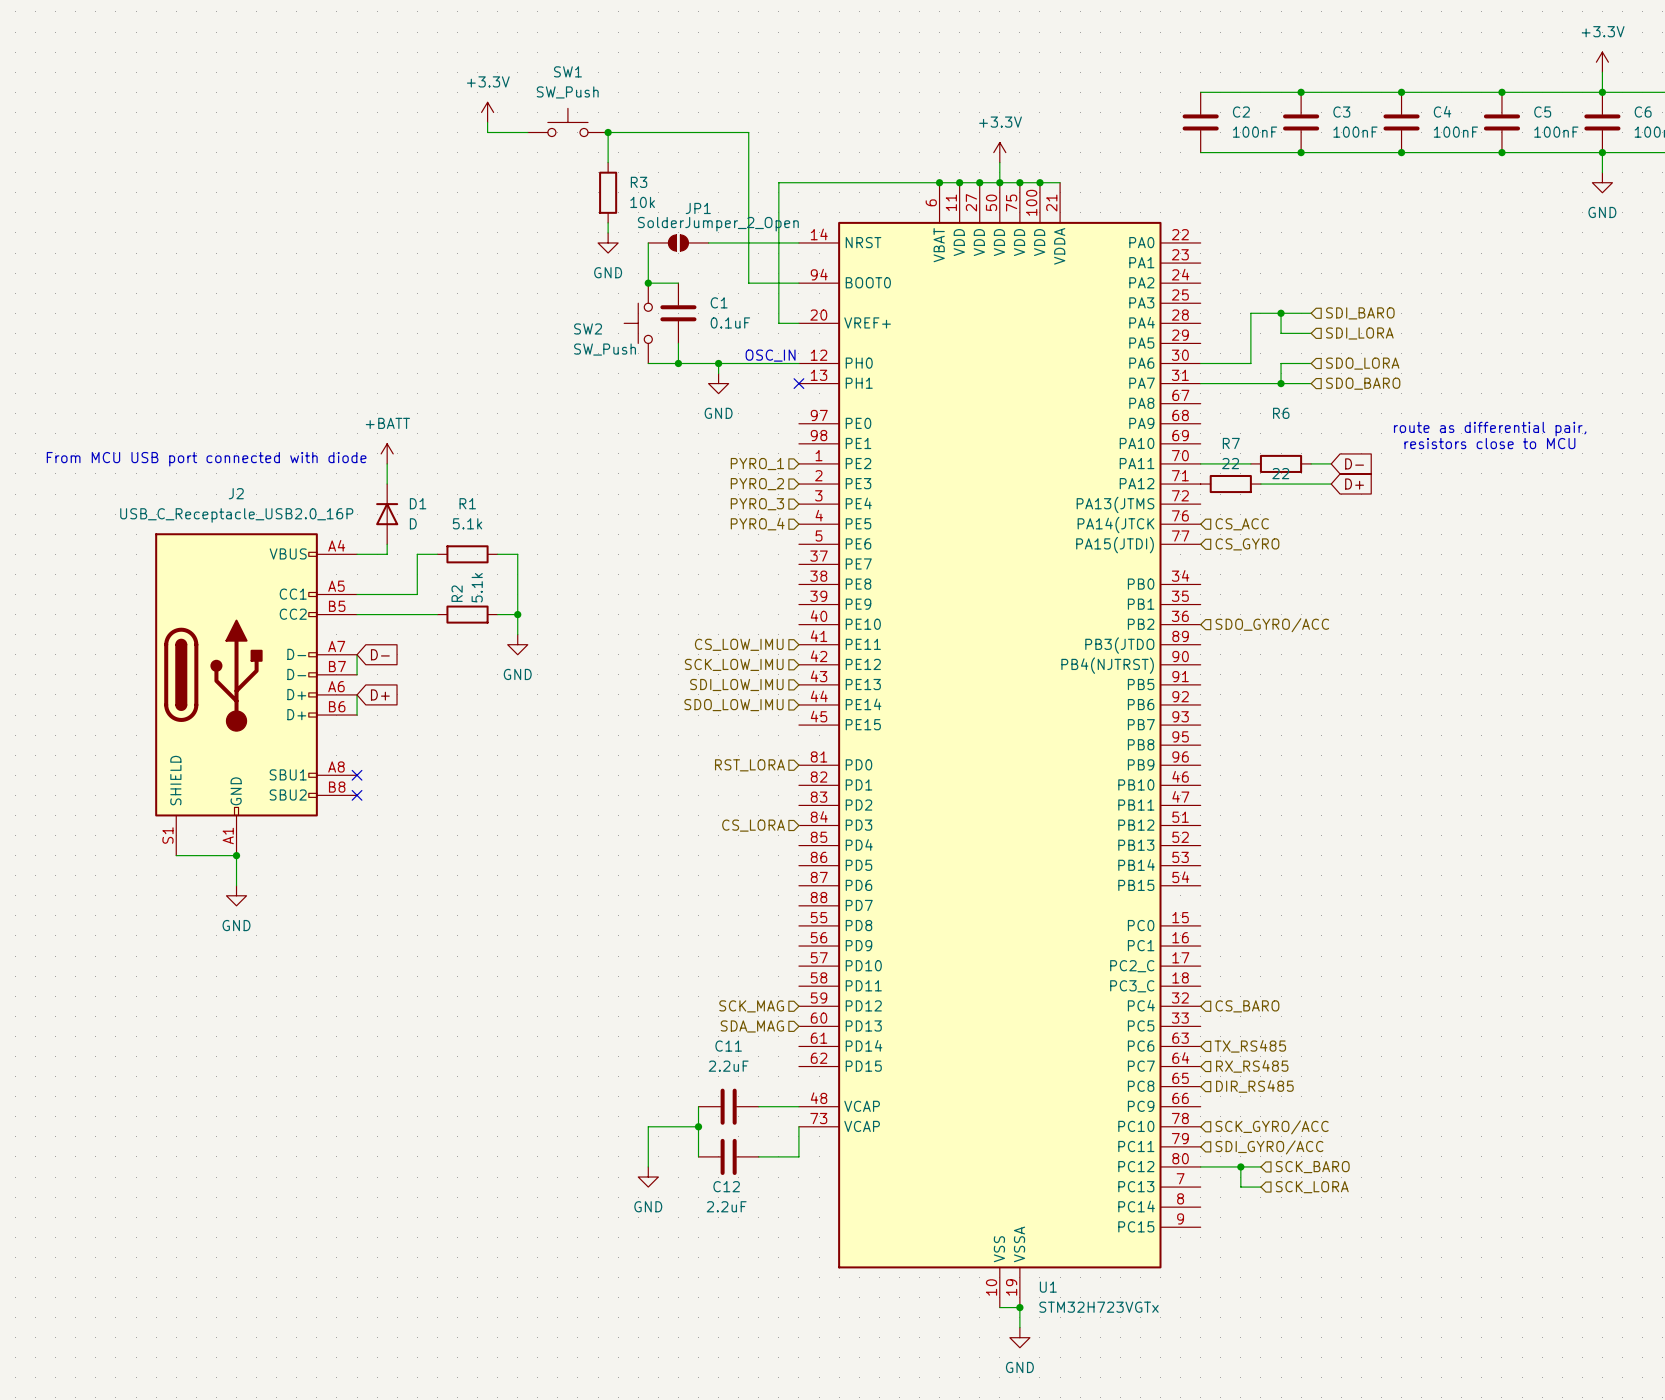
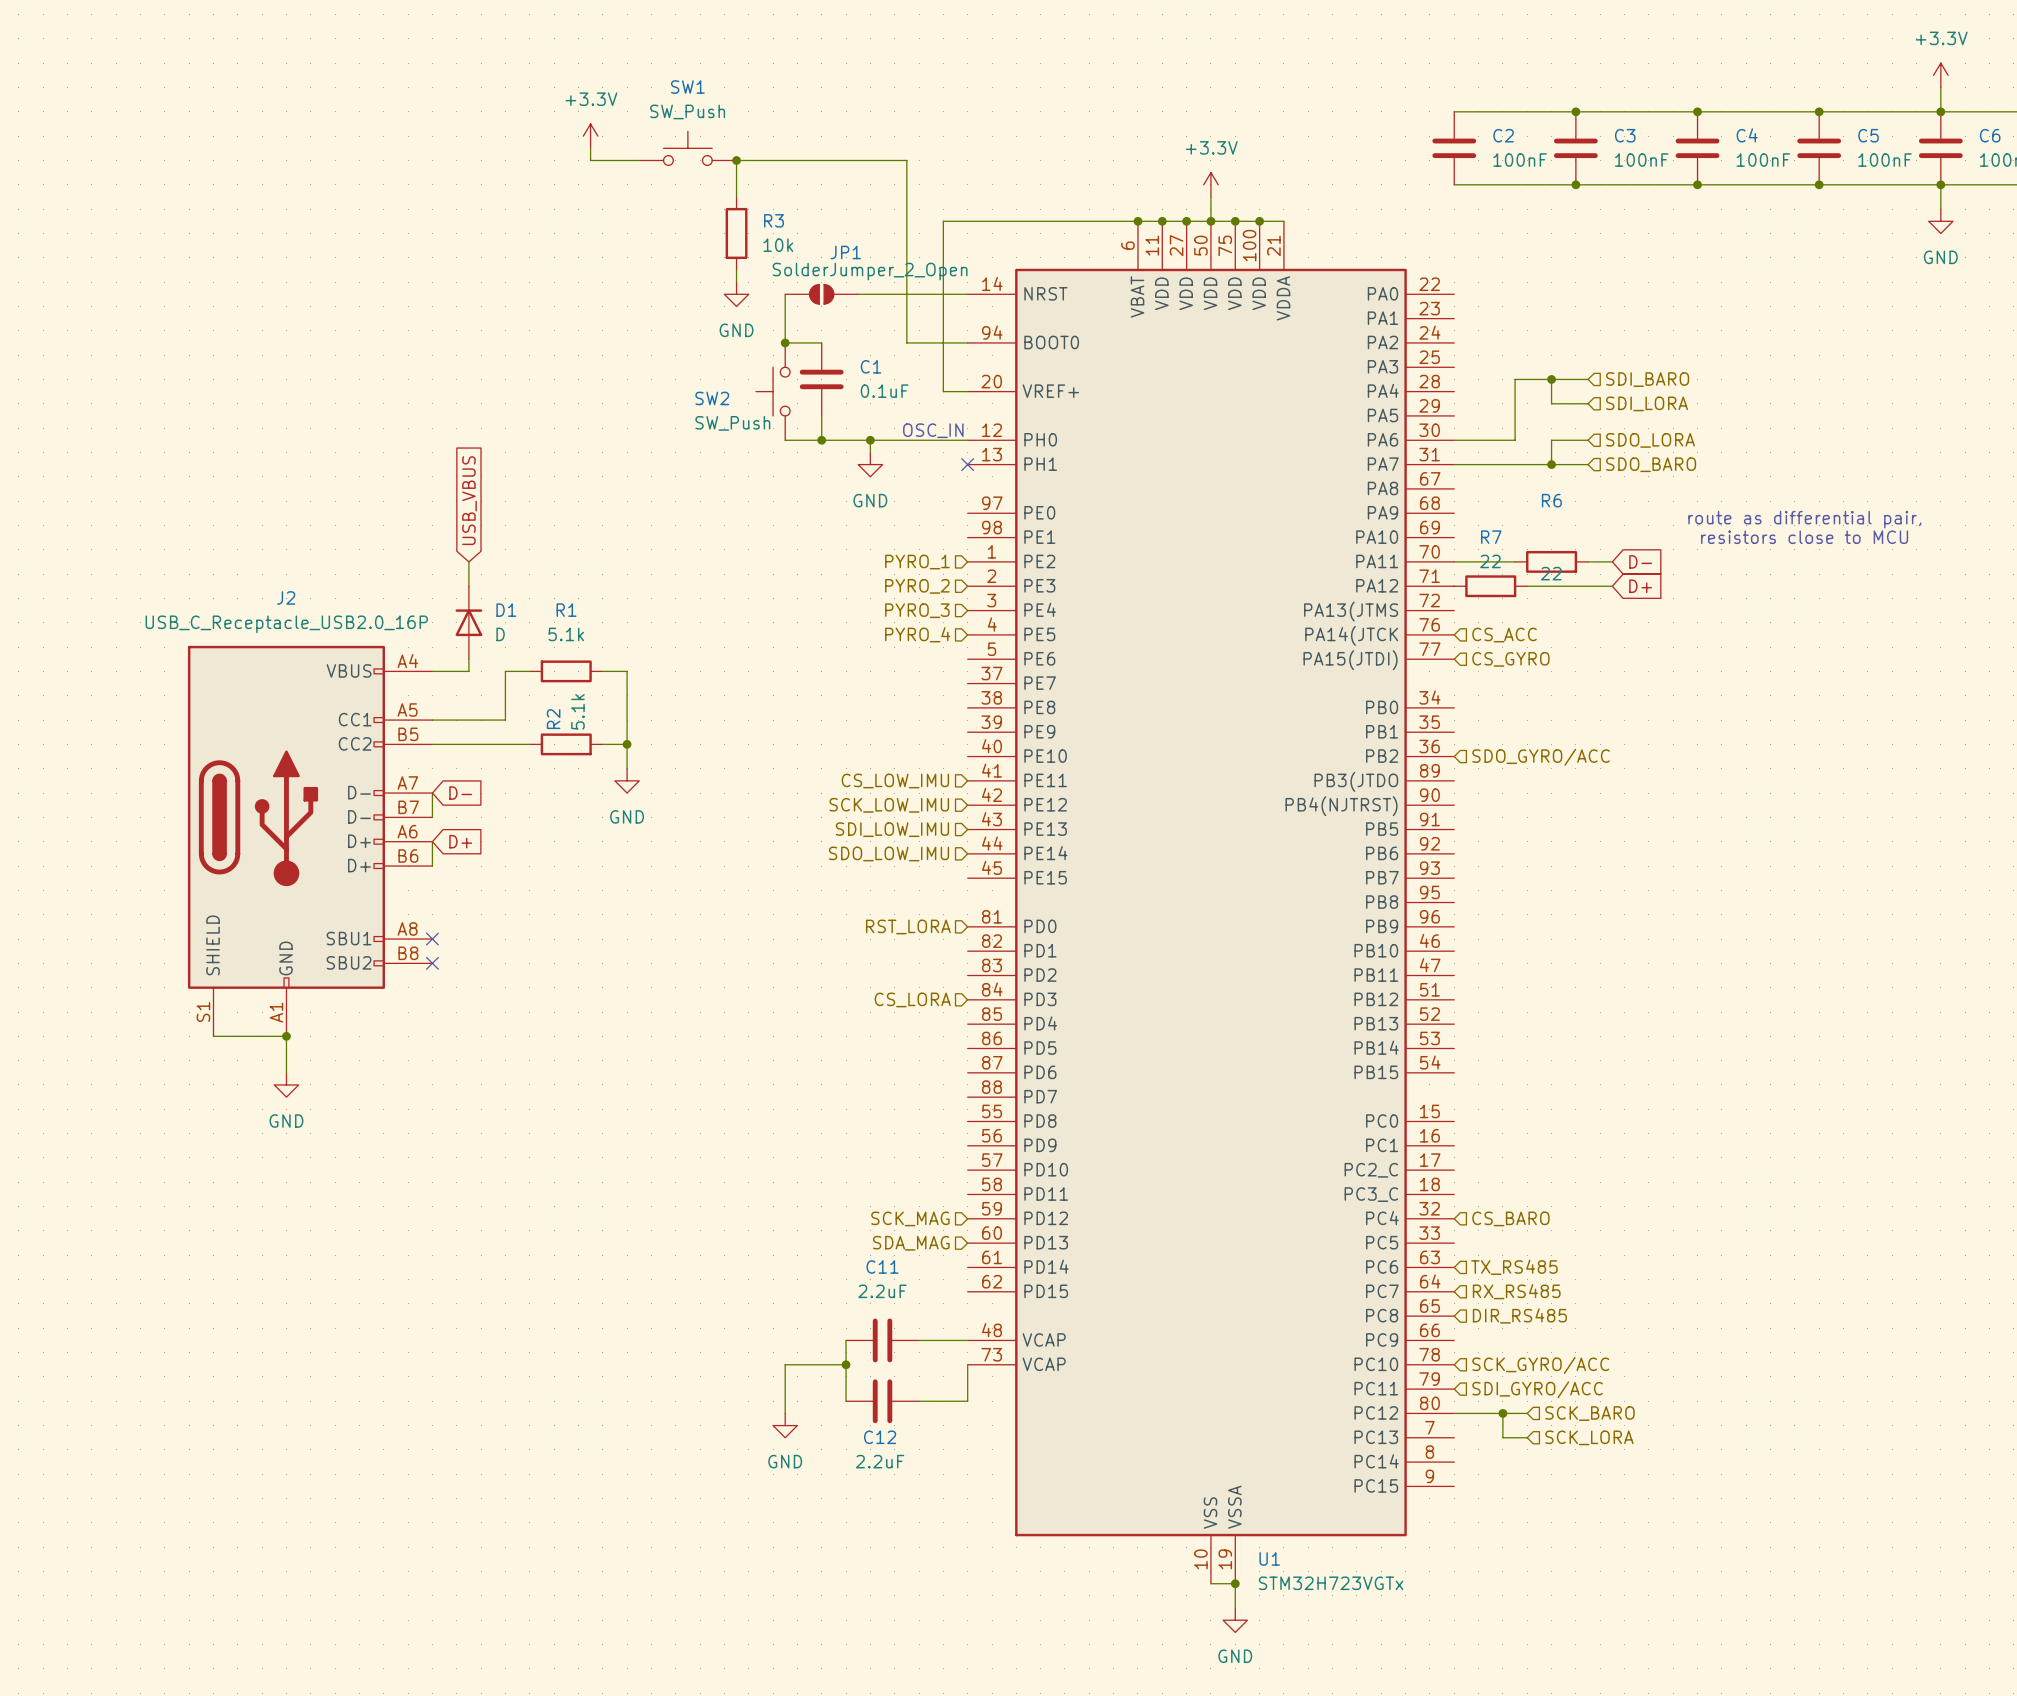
global label: none -> USB_VBUS (469, 500)
power symbol: +BATT (387, 453) -> none
text: From MCU USB port connected with diode (206, 459) -> none

